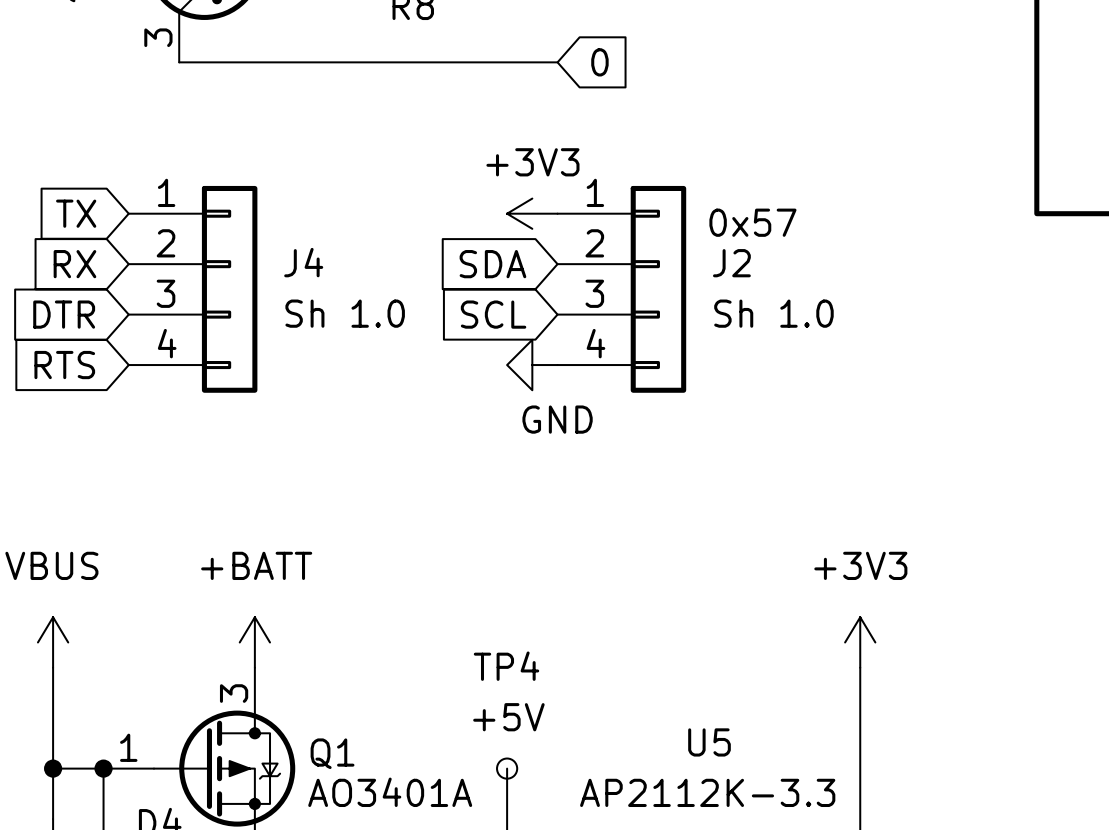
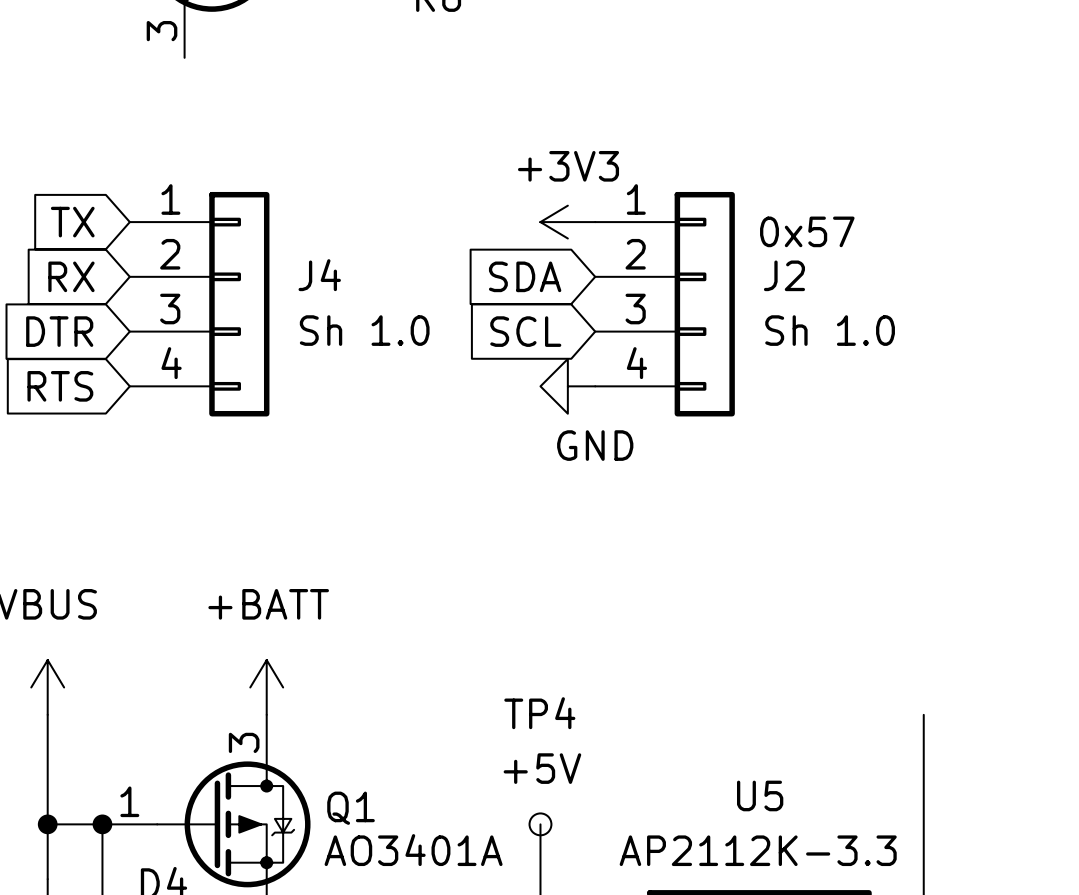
wire: (179, 62) (557, 62) -> none
global label: 0 (599, 62) -> none
power symbol: +3V3 (860, 642) -> none

